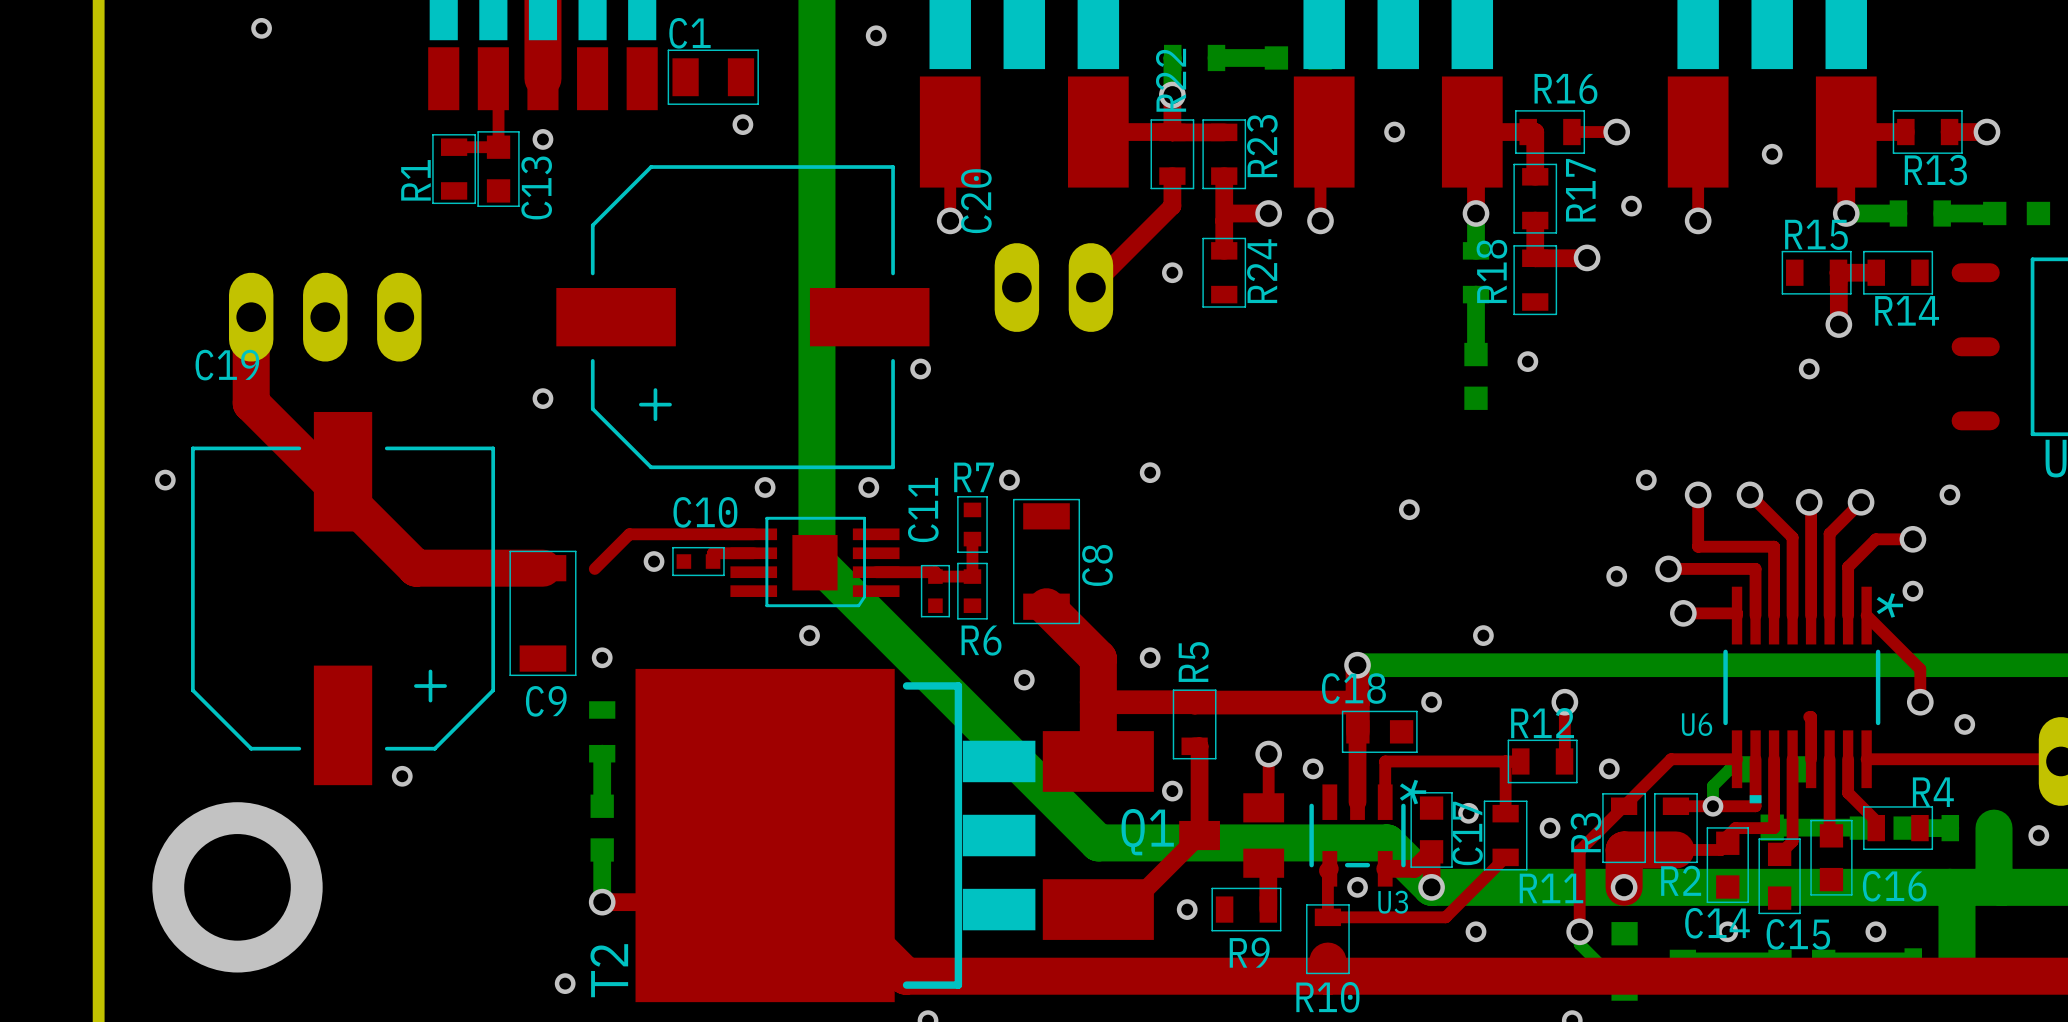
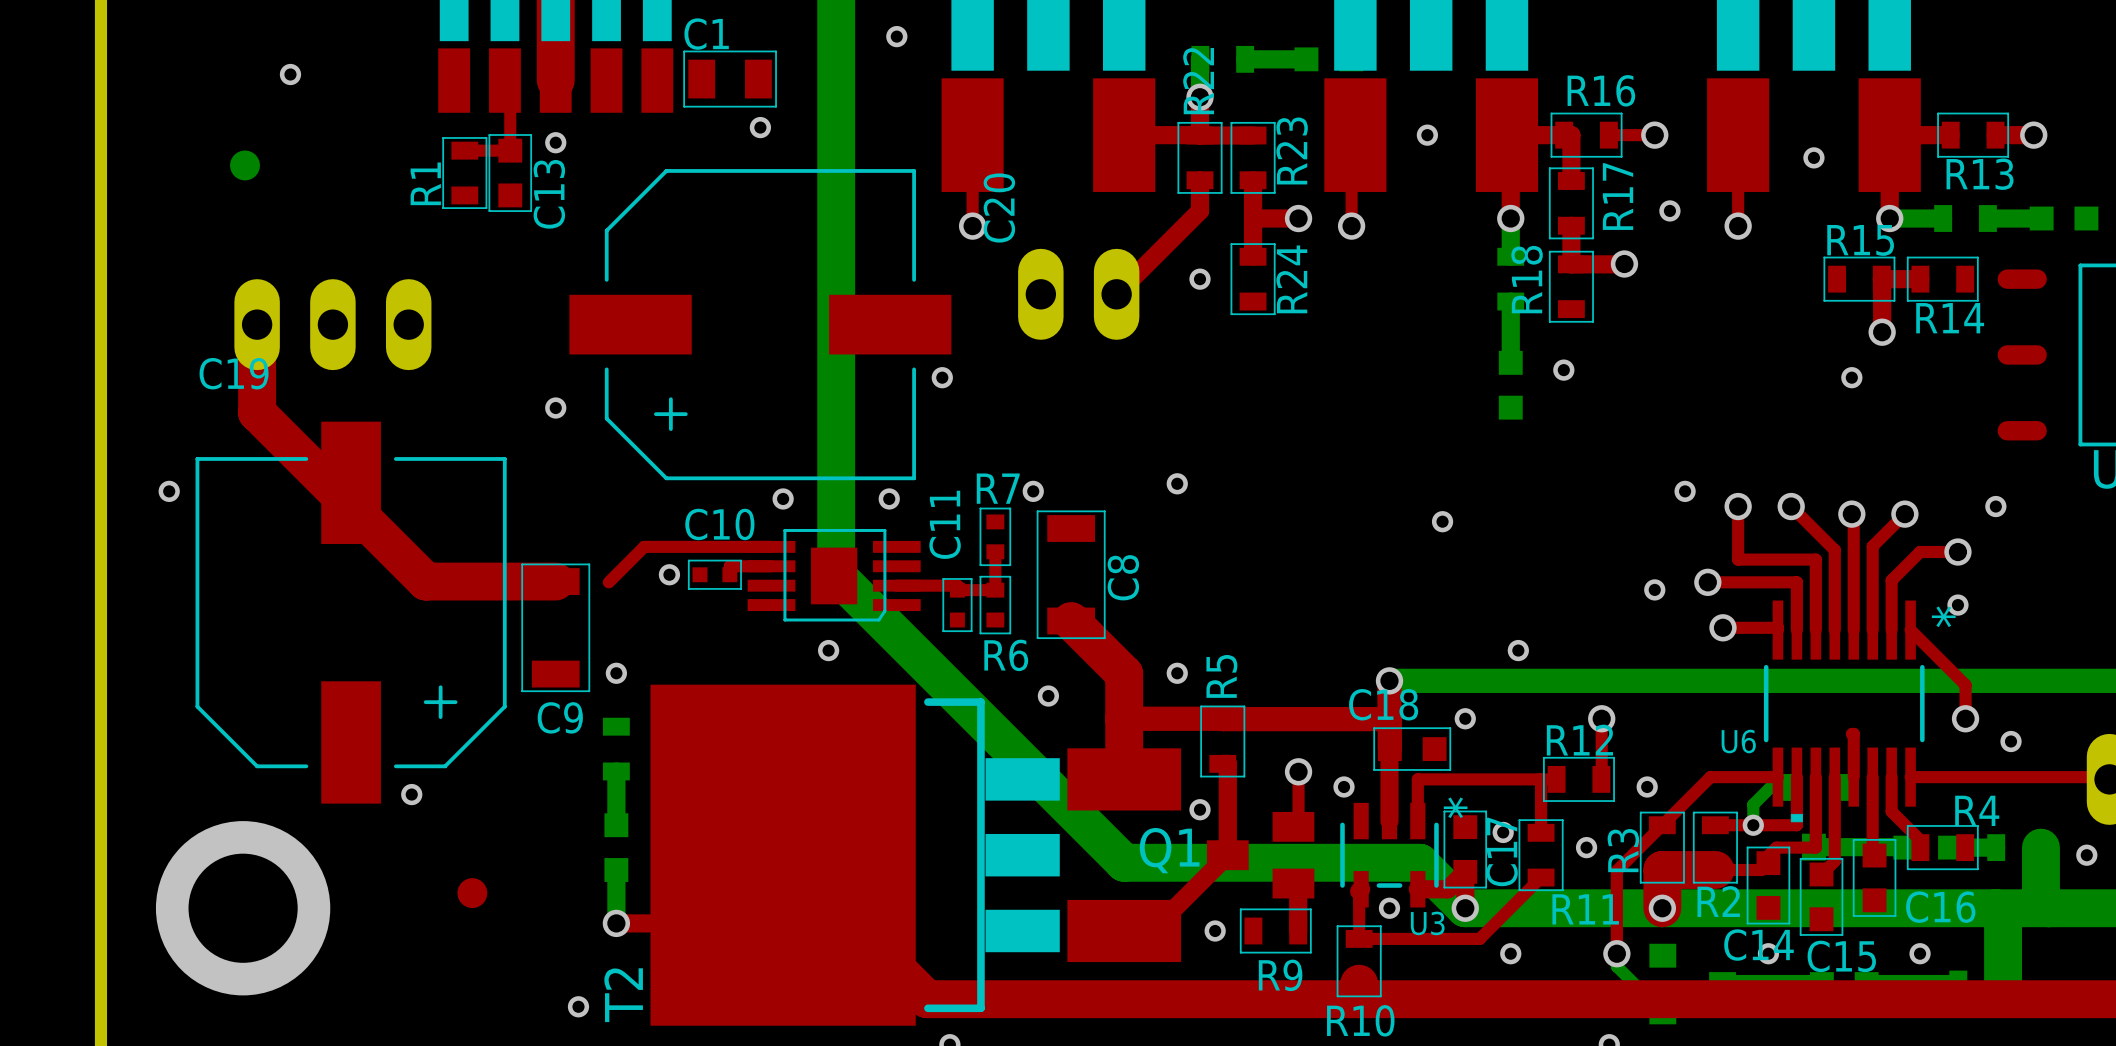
via position: (261, 28) -> (290, 74)
part: none -> (244, 165)
part: none -> (472, 893)

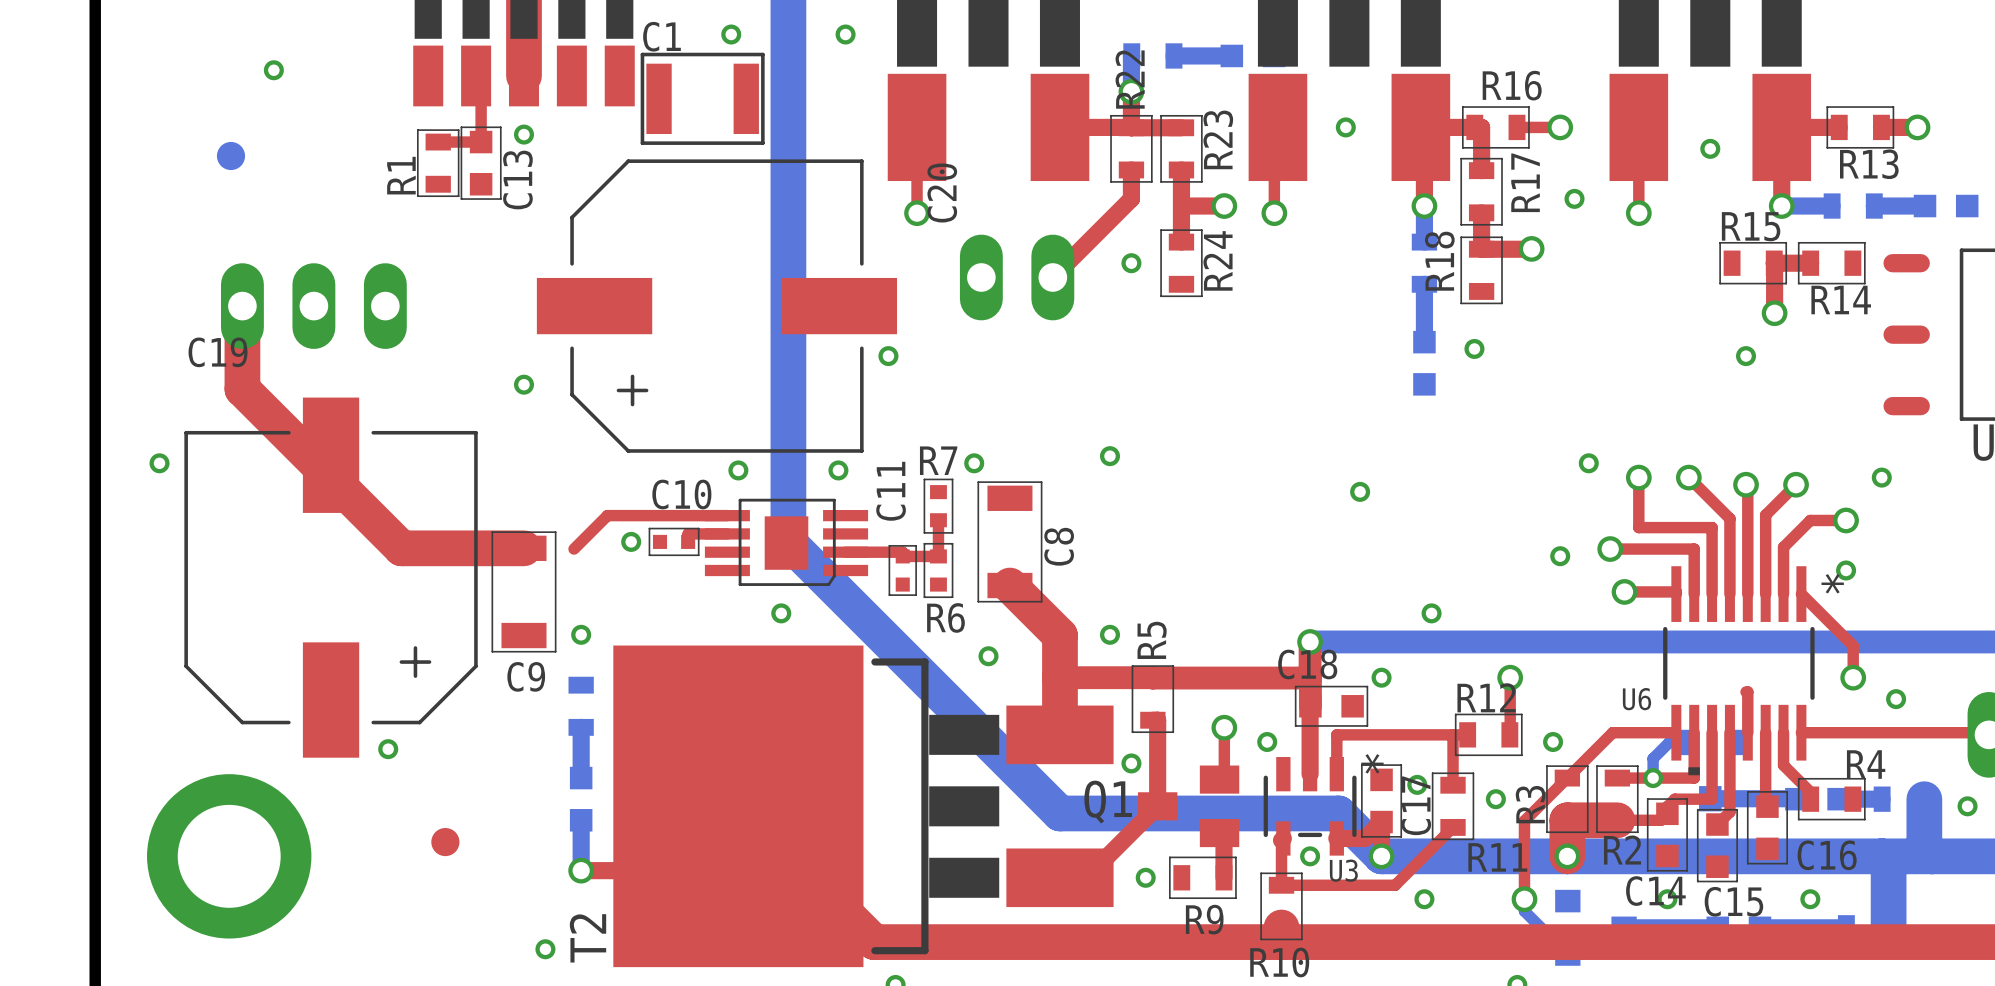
C1 footprint: [683, 50, 777, 108] -> [640, 52, 765, 145]
via position: (760, 127) -> (731, 34)

